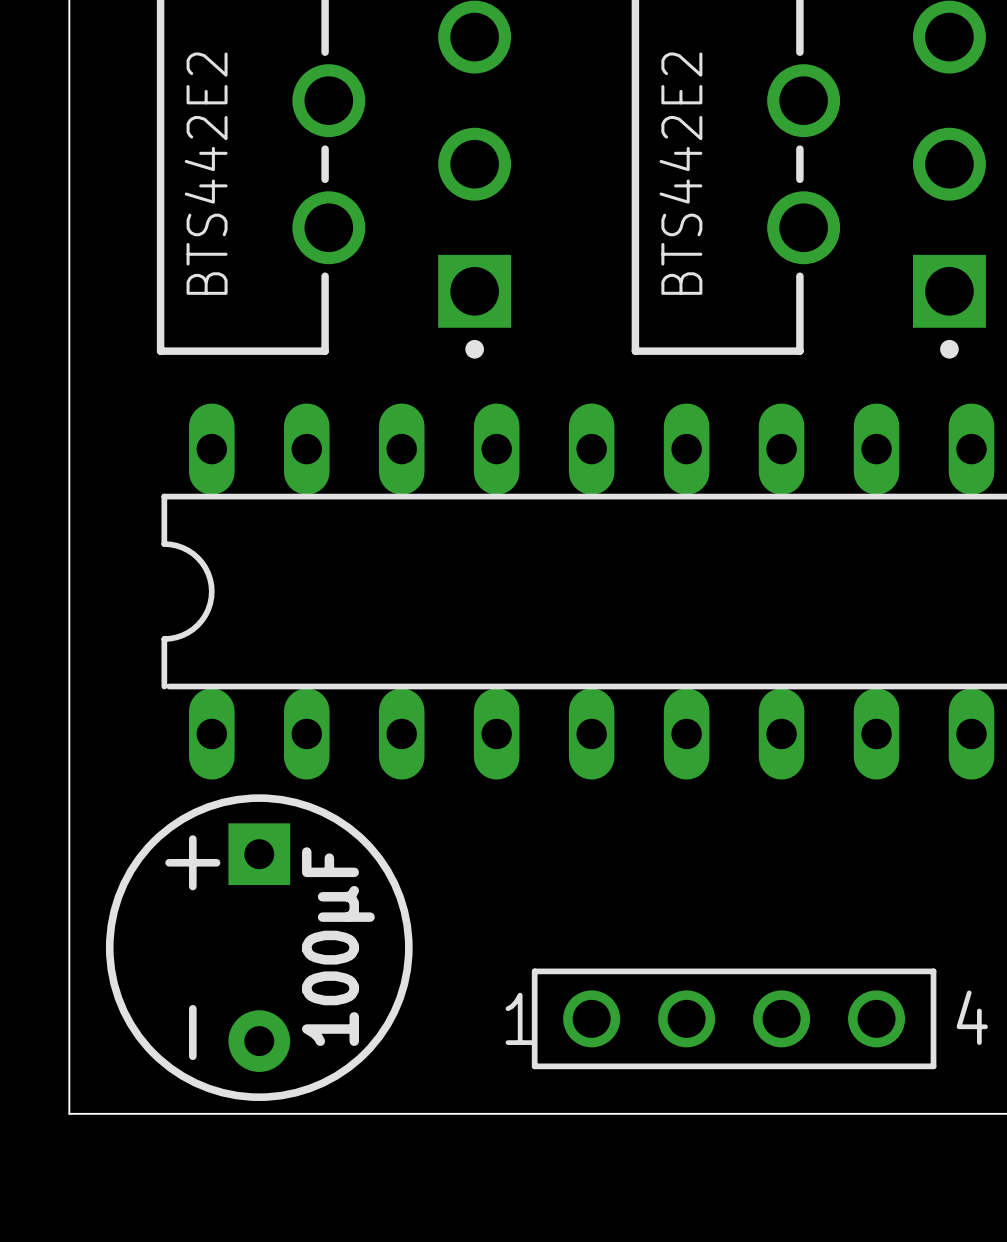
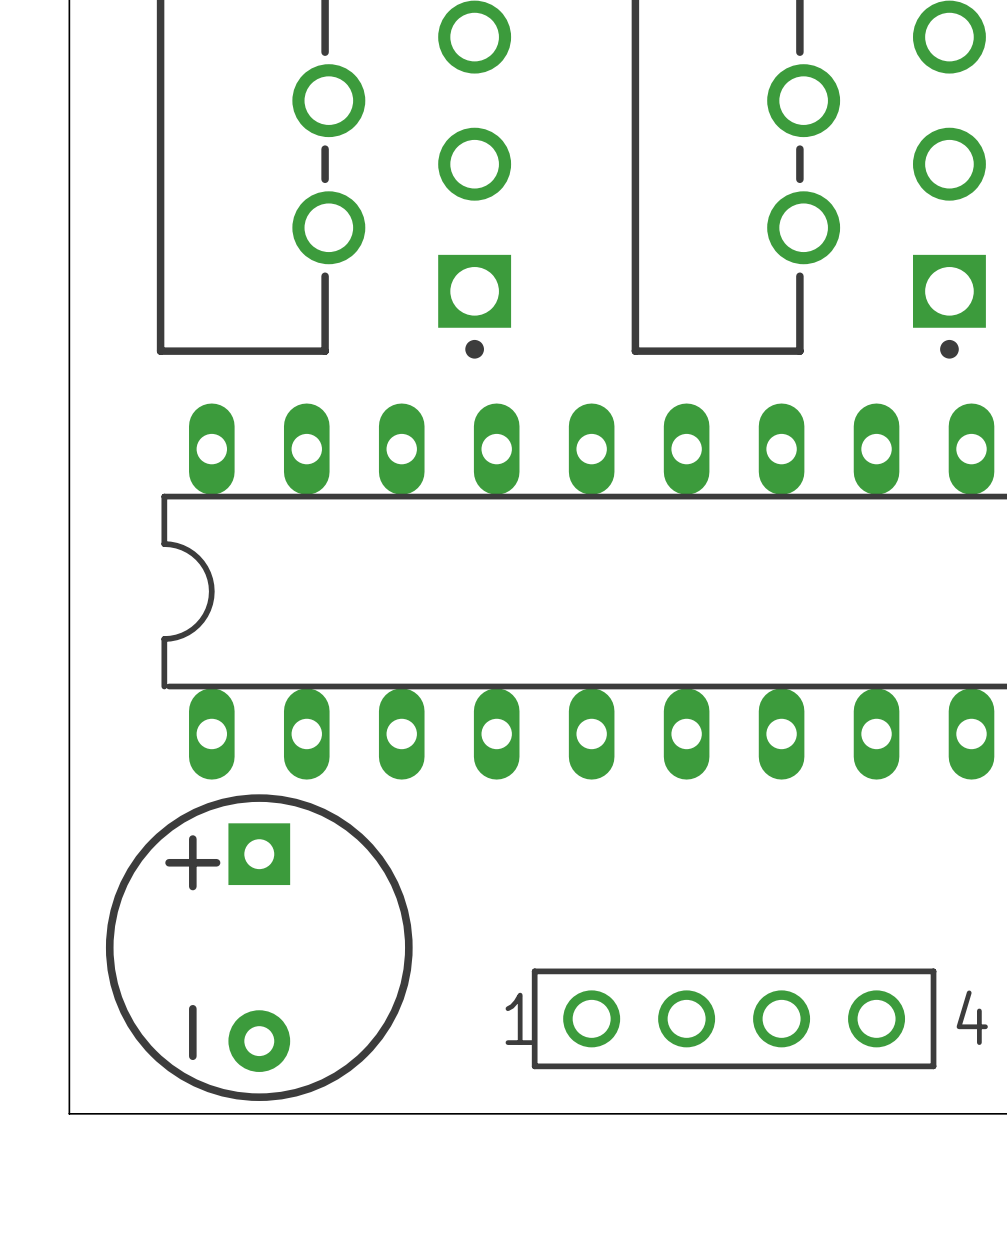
part text: BTS442E2 (206, 173) -> none
part text: BTS442E2 (680, 173) -> none
part text: 100µF (338, 946) -> none

